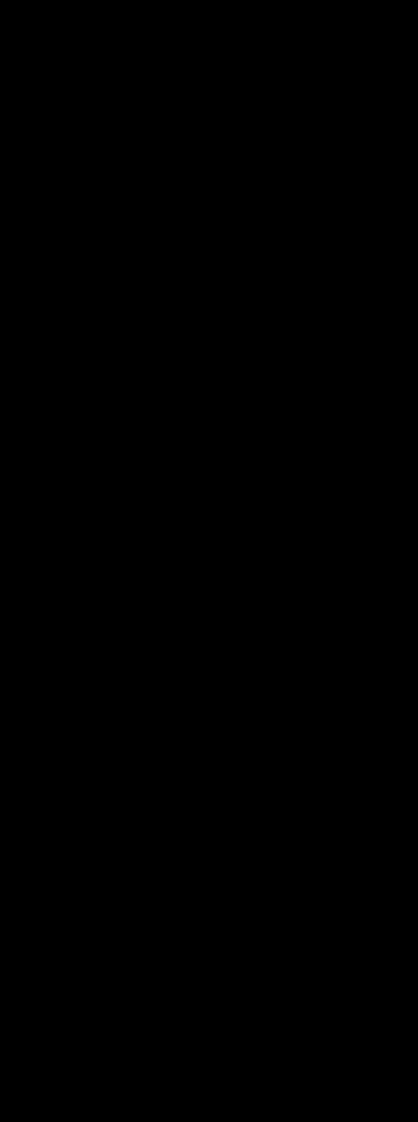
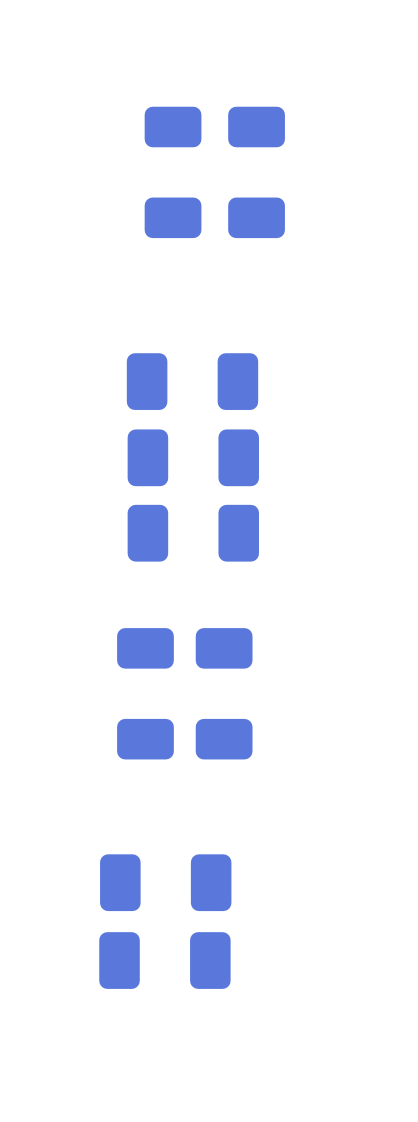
part: none -> (173, 172)
part: none -> (256, 172)
part: none -> (192, 381)
part: none -> (193, 457)
part: none -> (193, 533)
part: none -> (145, 693)
part: none -> (224, 693)
part: none -> (165, 882)
part: none -> (164, 960)

